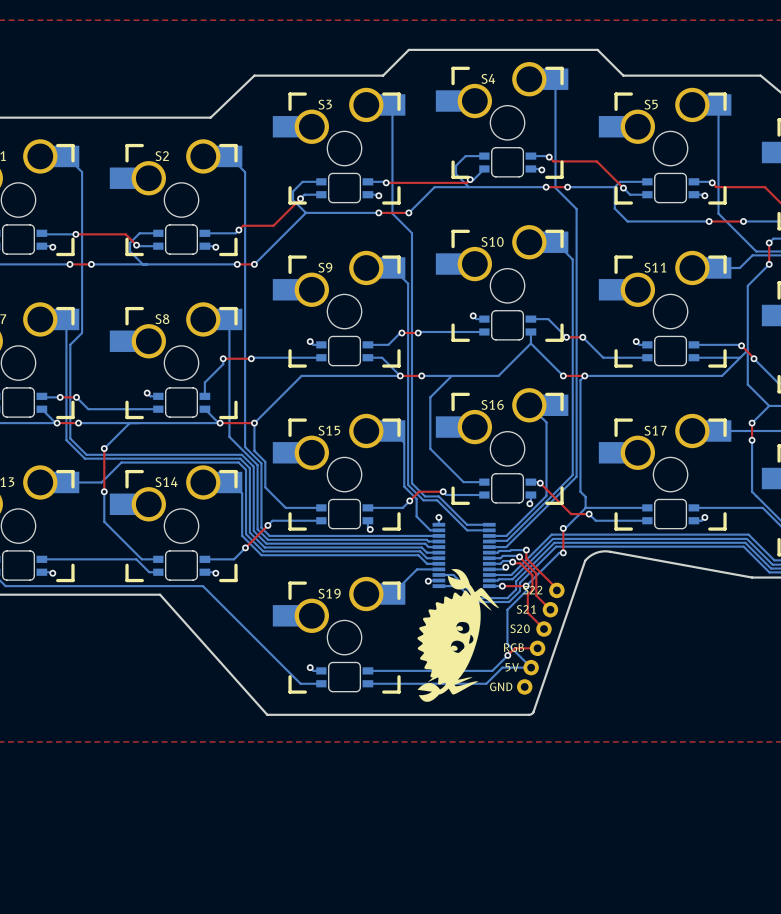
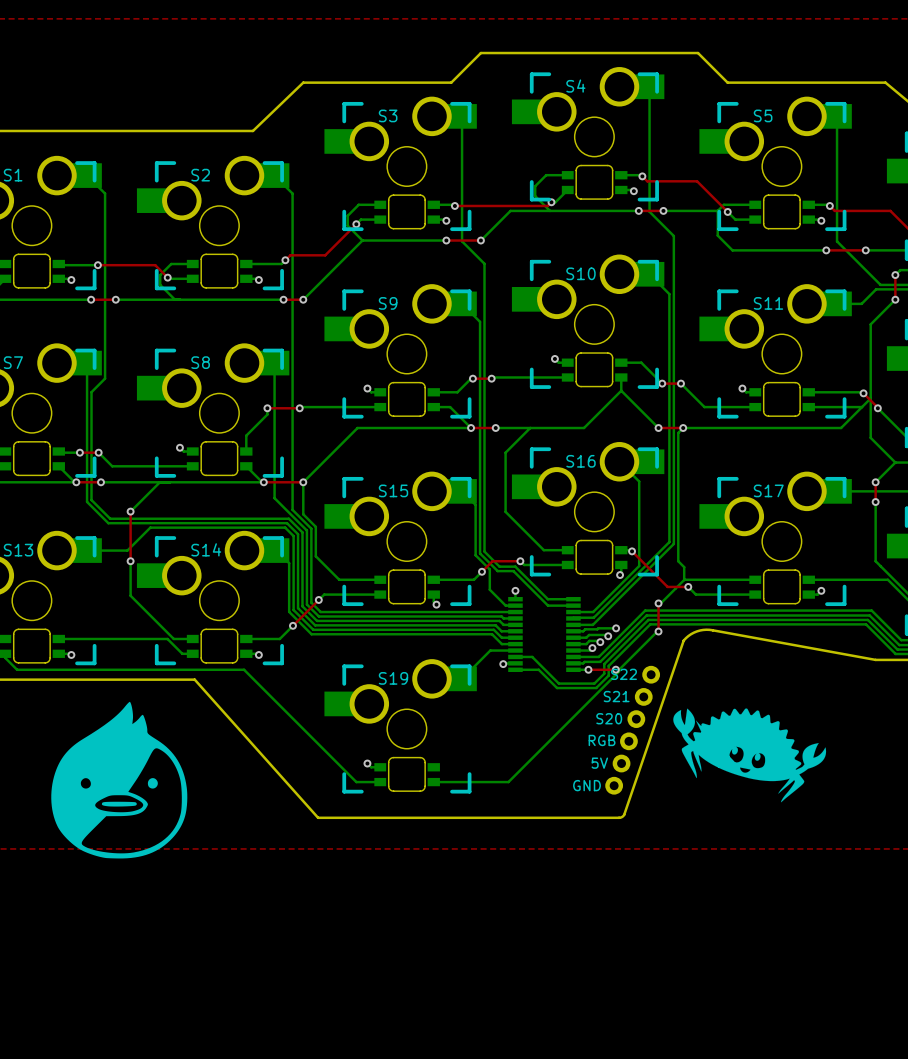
top track: (526, 550) (526, 558) (556, 590) -> none
bottom track: (562, 552) (559, 552) (526, 586) (526, 591) (507, 609) (507, 643) (531, 667) (502, 667) (486, 683) (432, 683) -> (657, 631) (508, 782)
top track: (519, 556) (536, 573) (536, 595) (550, 609) -> none
top track: (512, 562) (520, 563) (532, 575) (532, 590) (527, 595) (527, 612) (544, 629) -> none
drawing: [417, 569, 500, 702] -> none
drawing: none -> [51, 701, 188, 859]
drawing: none -> [673, 708, 827, 803]
top track: (537, 648) (514, 648) (507, 655) -> none
bottom track: (507, 655) (492, 670) (367, 670) -> none
via: (507, 655) -> none

